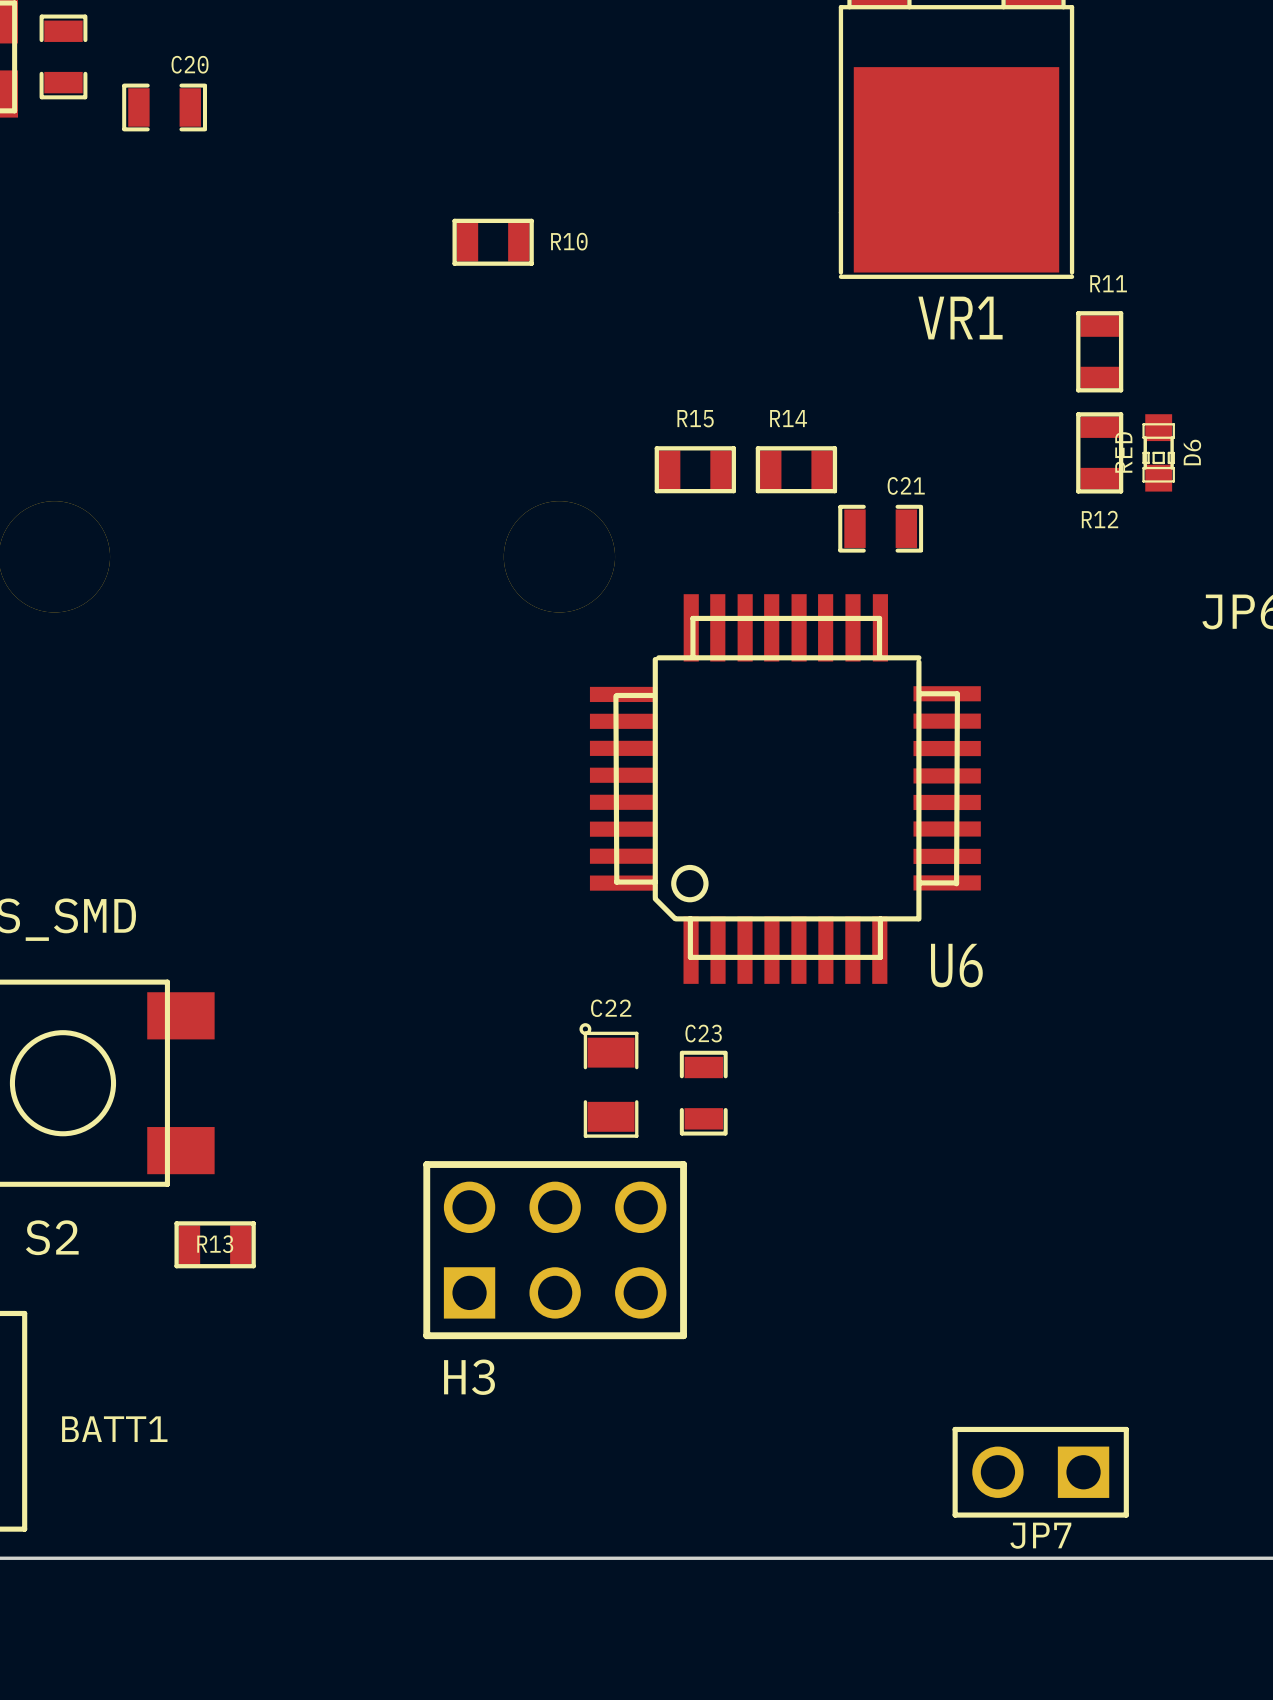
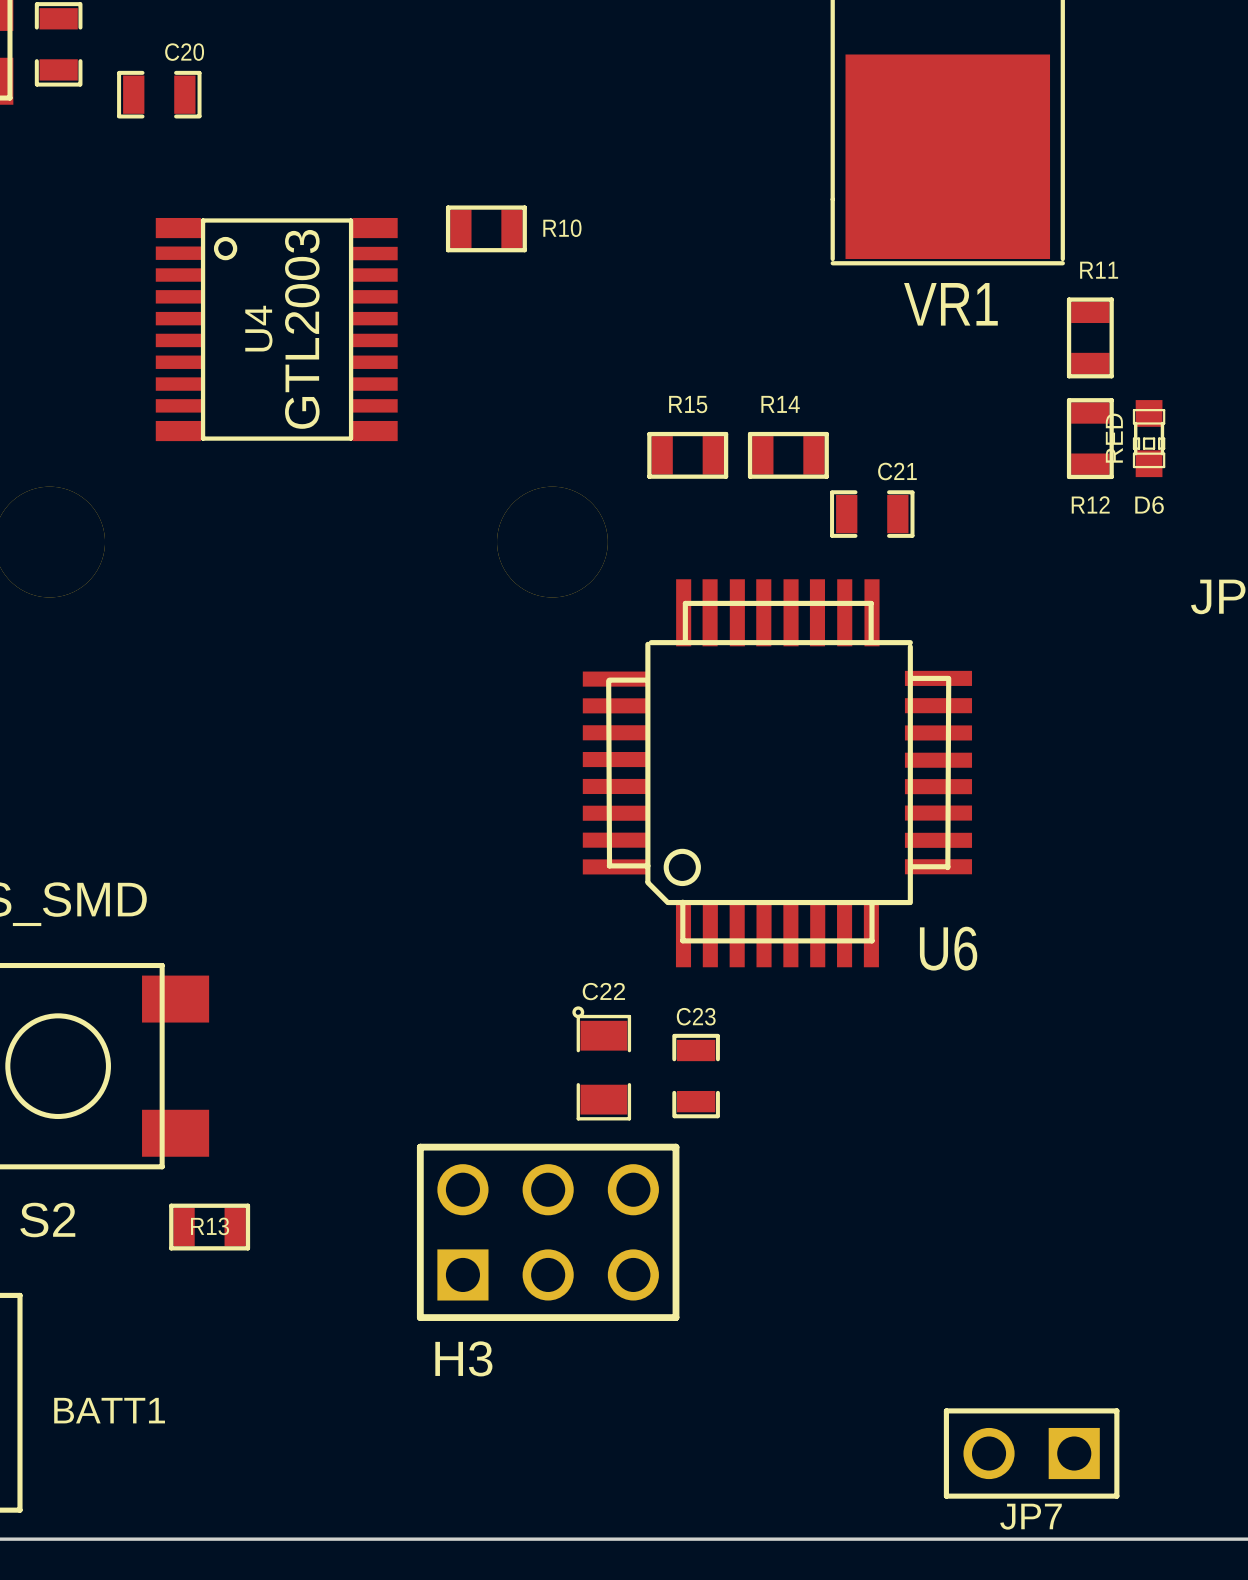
U4: none -> GTL2003 (276, 329)
D6 name rotation: 0° (1192, 452) -> 90° clockwise (1149, 505)
D6 name position: D6 (1192, 452) -> D6 (1149, 505)

